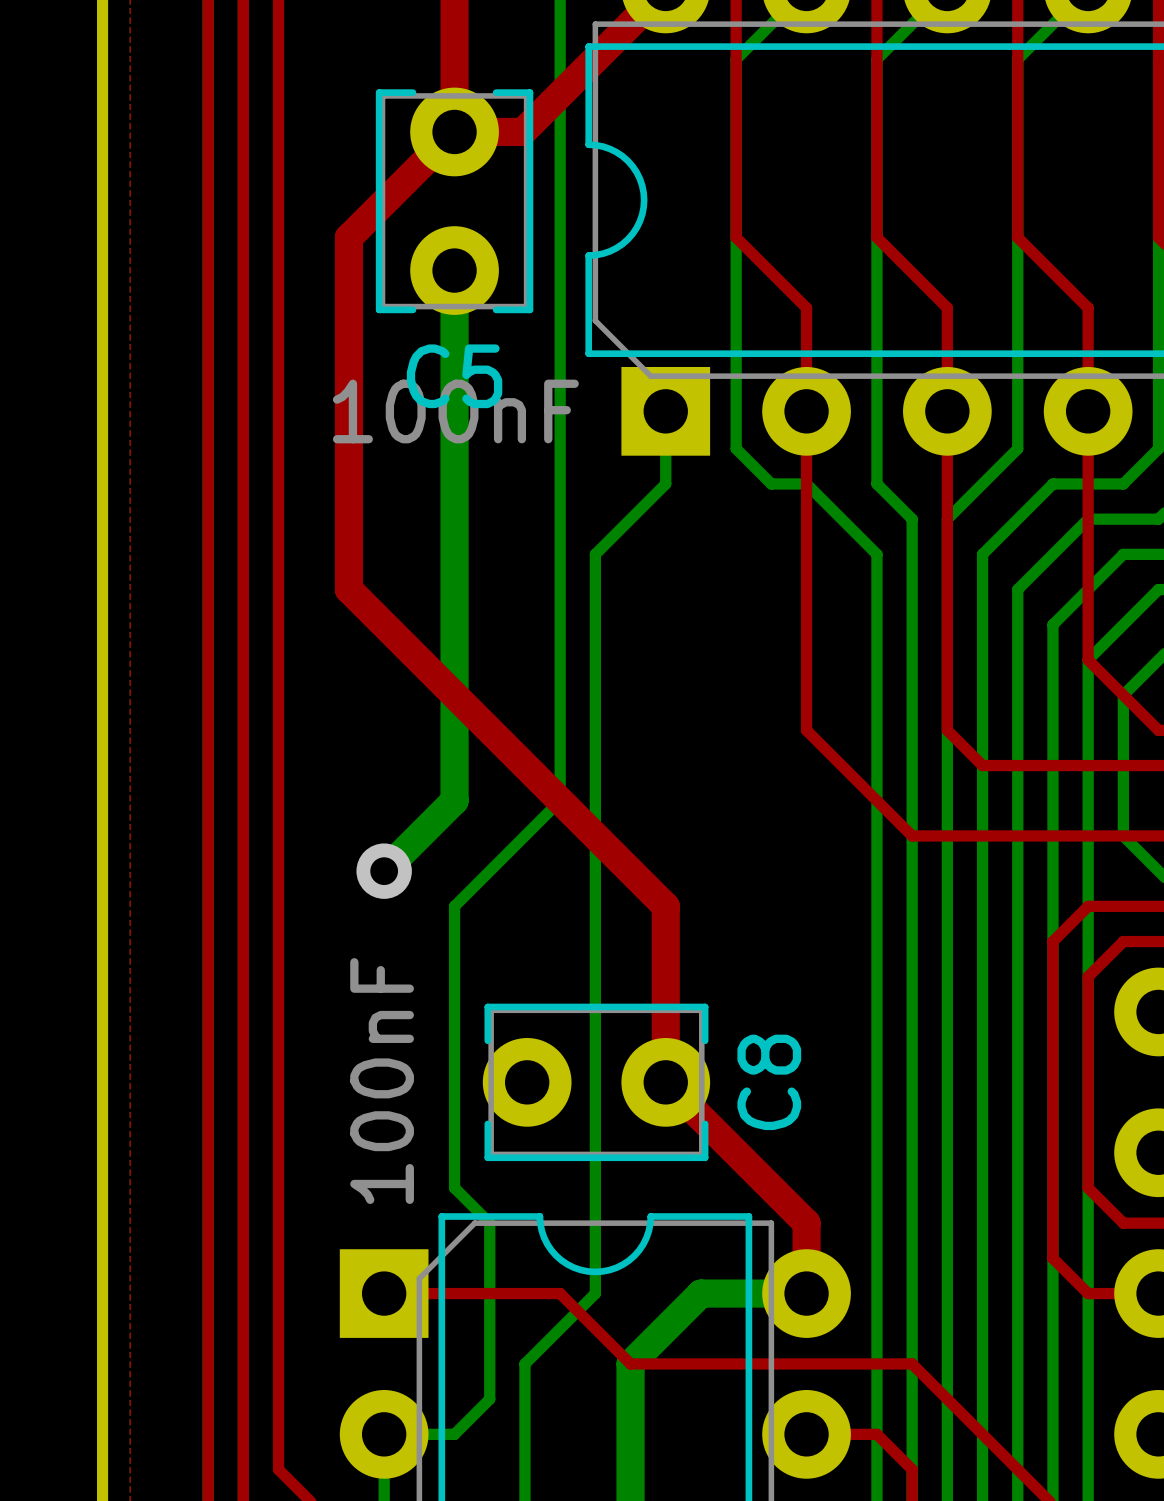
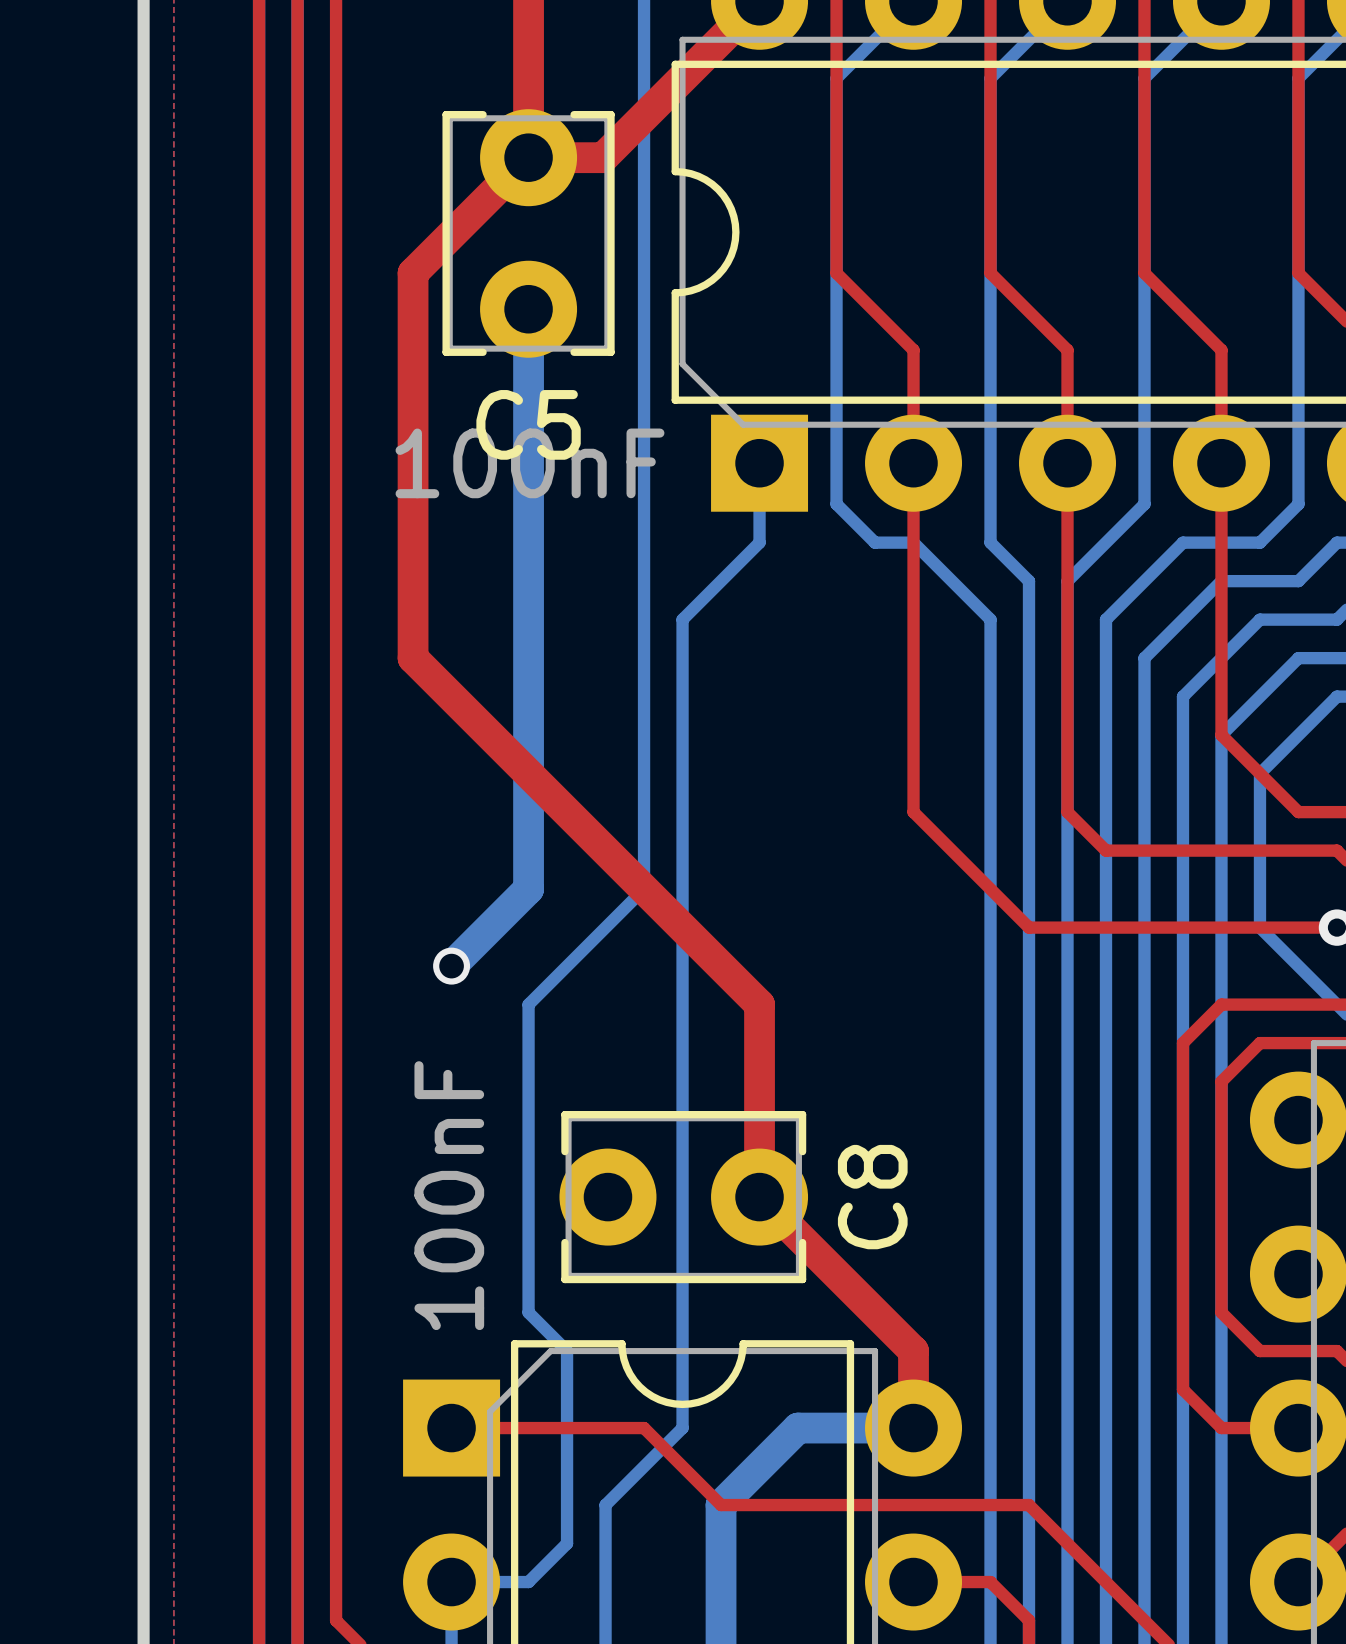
via size: [356, 843, 412, 899] -> [433, 947, 471, 985]

